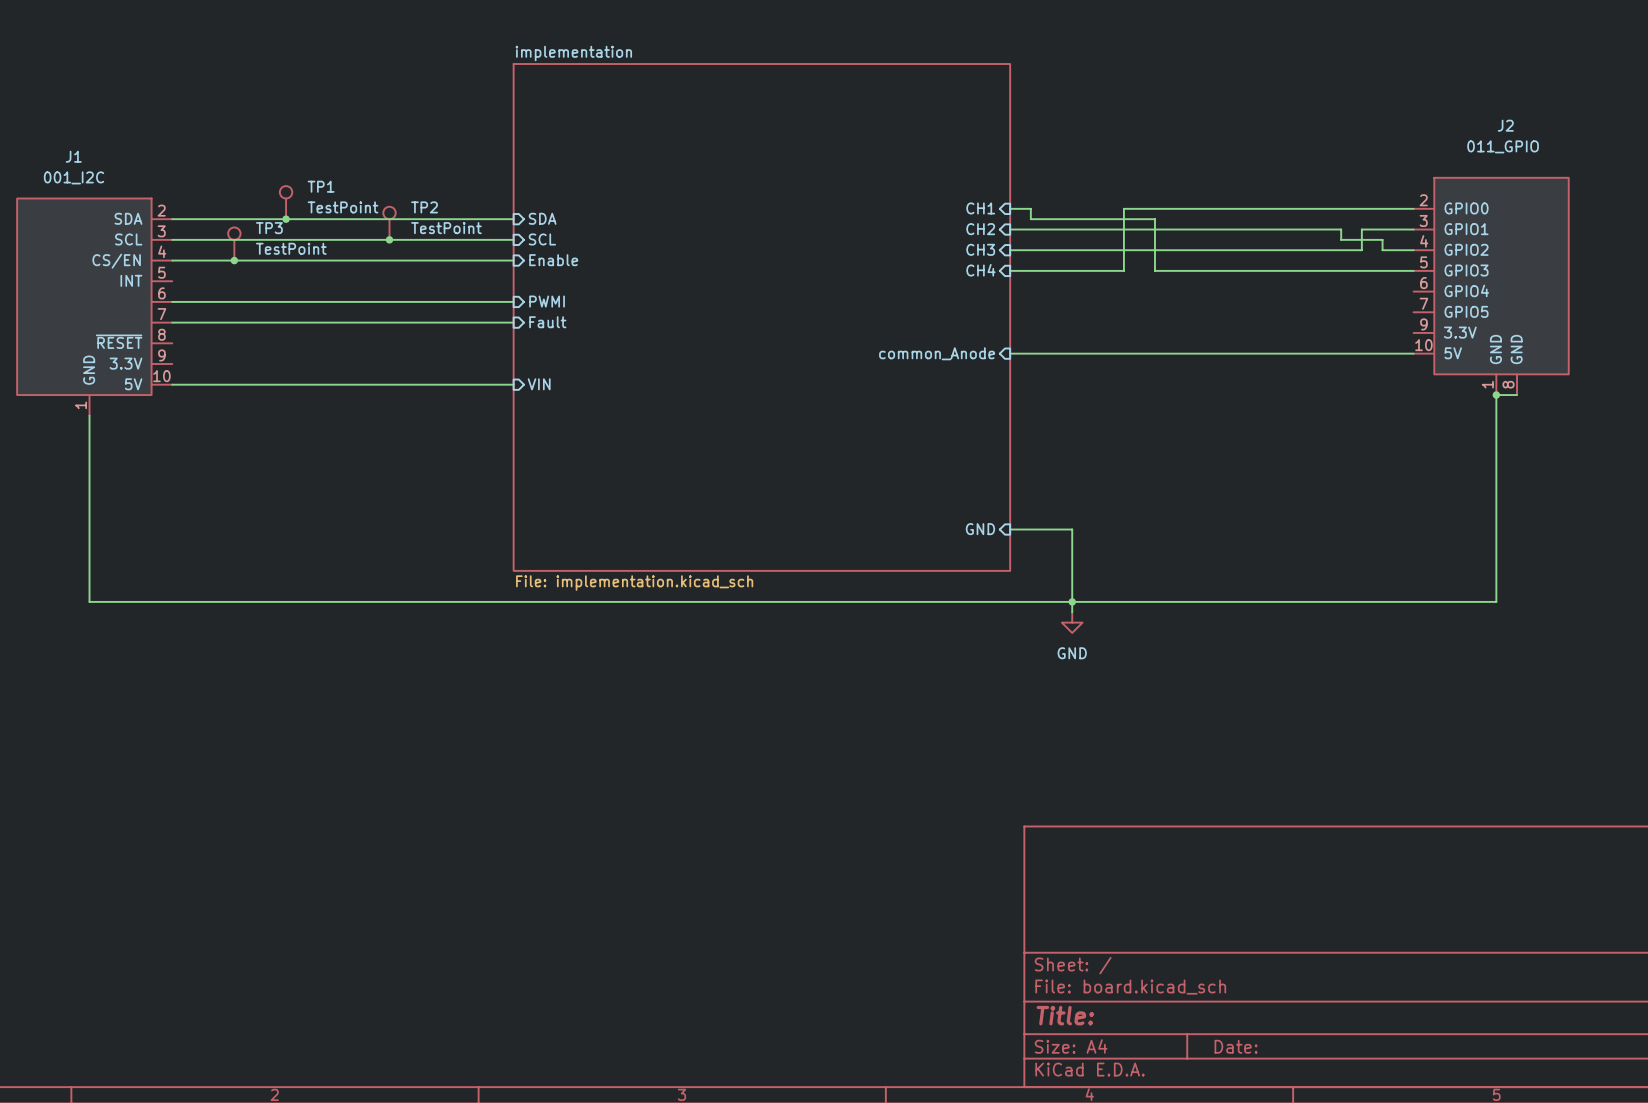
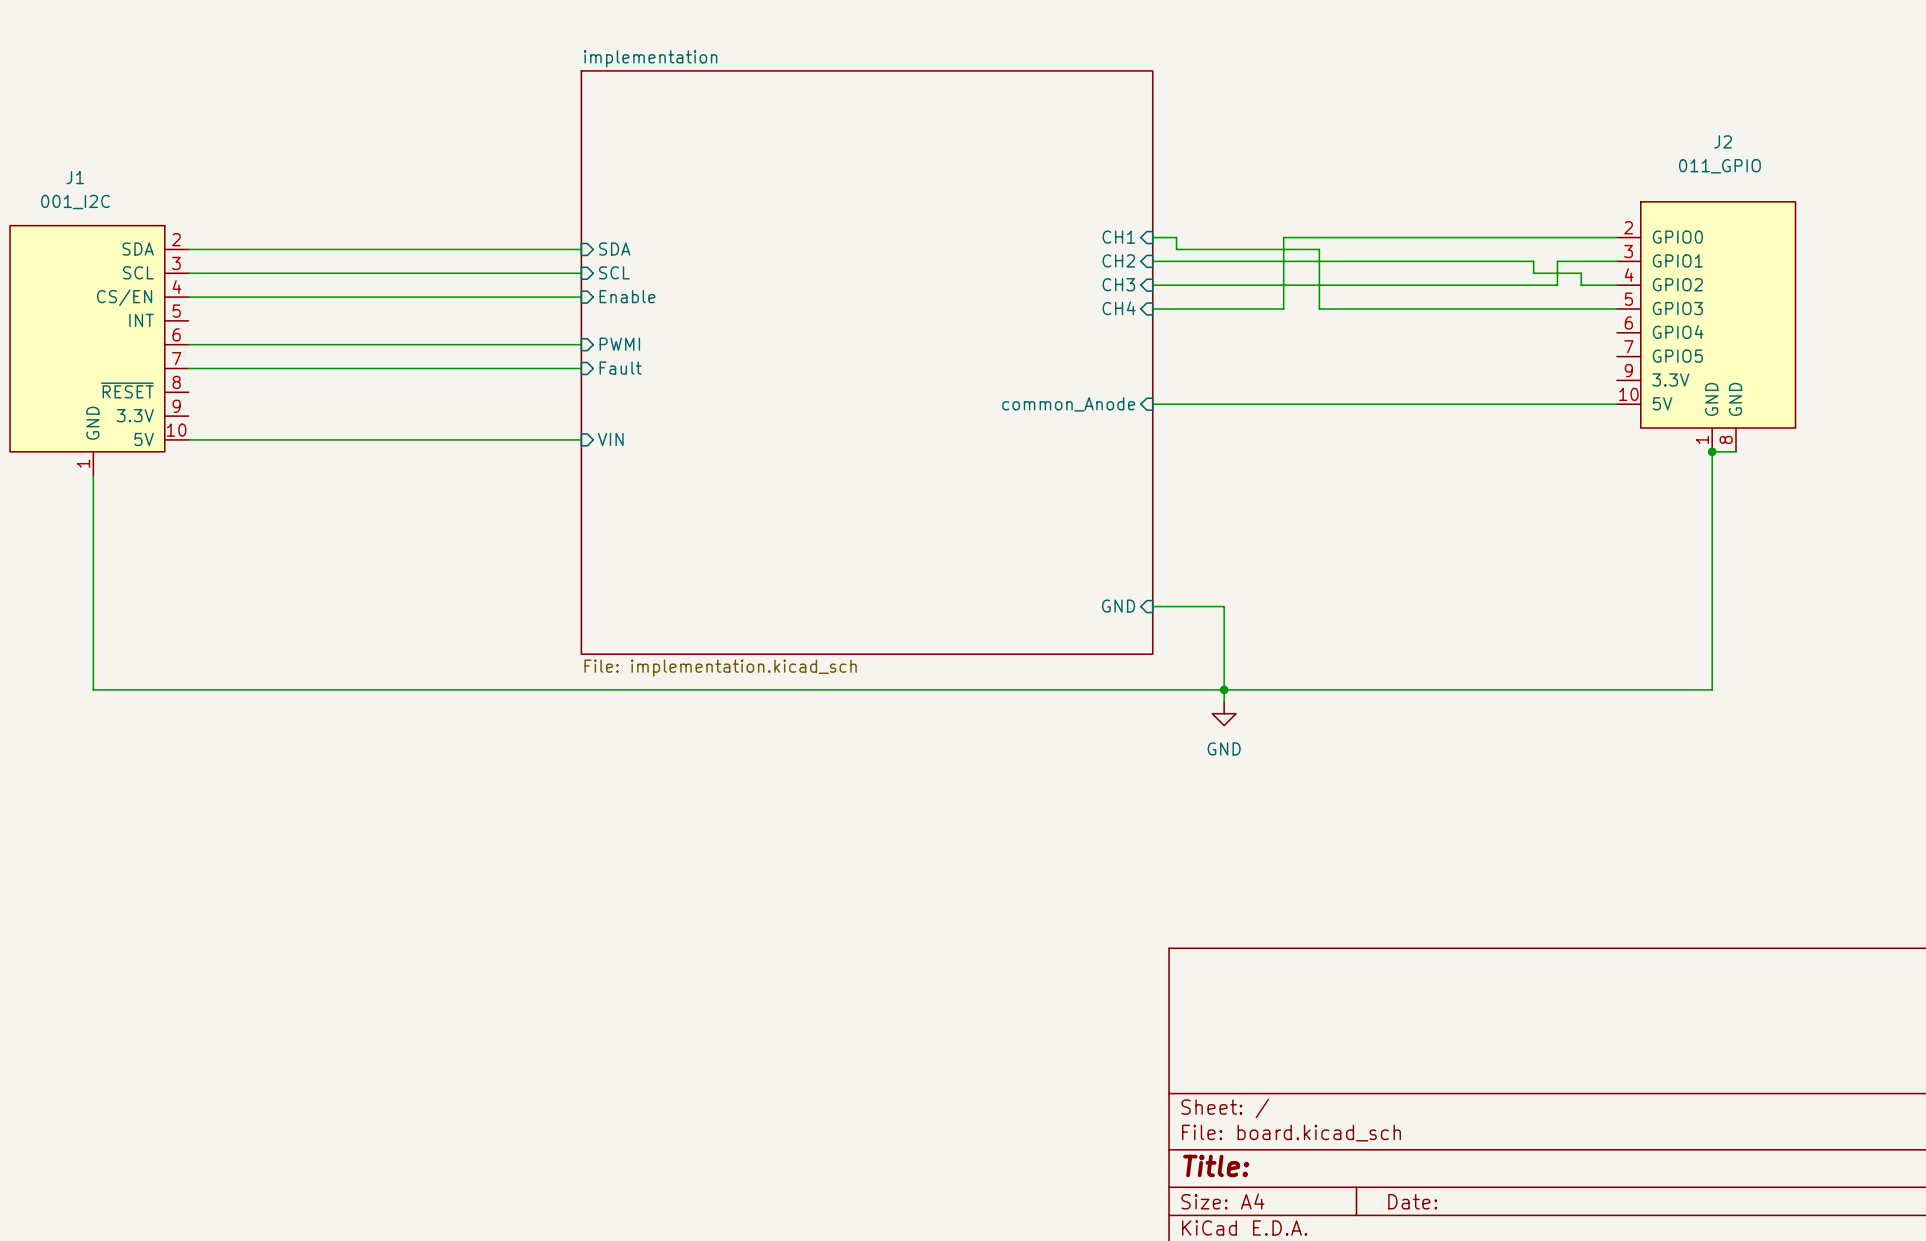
TP1: TestPoint (286, 202) -> none
junction: (286, 219) -> none
TP2: TestPoint (389, 223) -> none
junction: (389, 239) -> none
TP3: TestPoint (234, 244) -> none
junction: (234, 260) -> none

